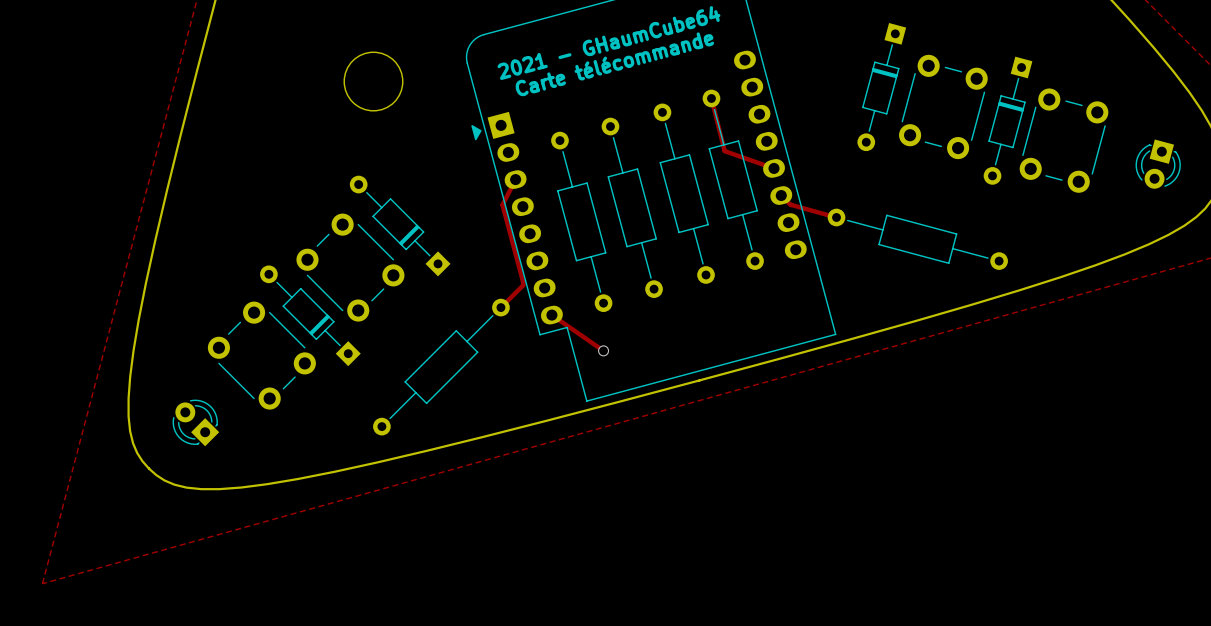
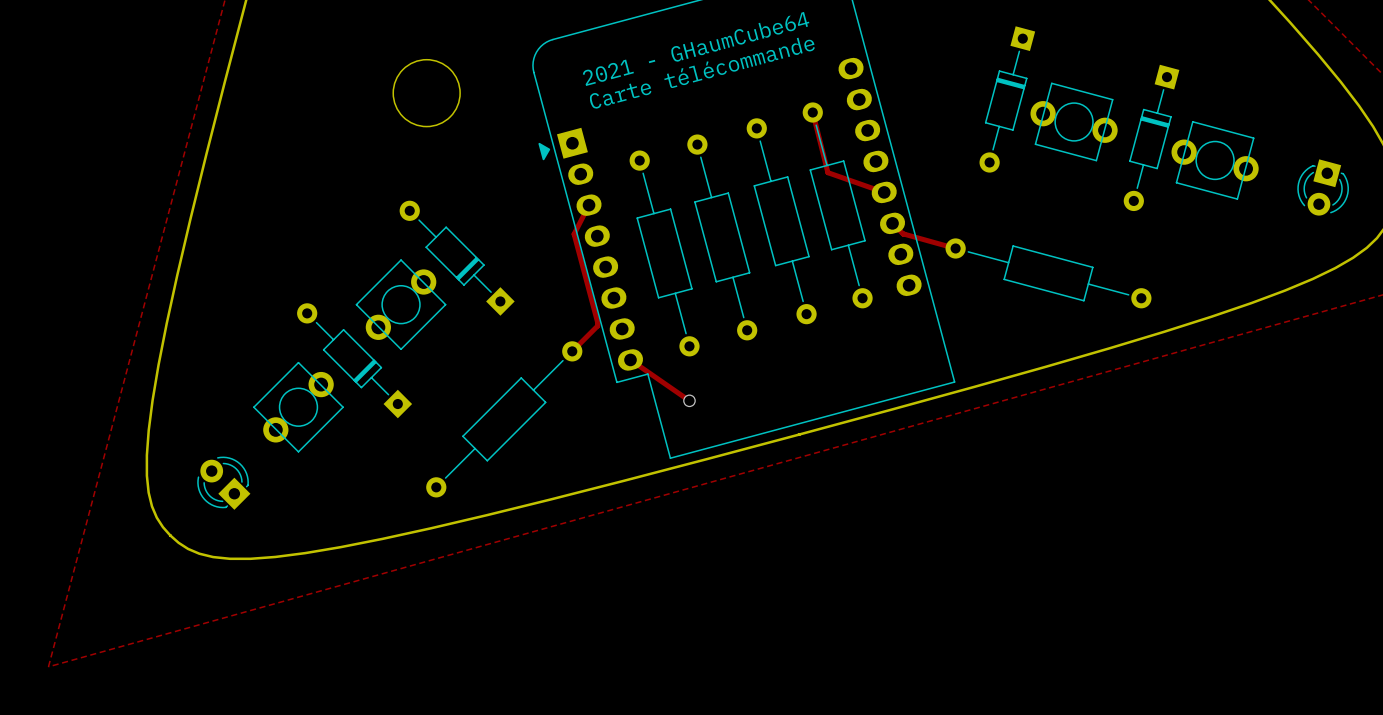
part footprint: [899, 54, 988, 160] -> [1030, 82, 1118, 162]
part footprint: [1019, 88, 1109, 193] -> [1171, 121, 1259, 200]
part footprint: [296, 213, 405, 322] -> [355, 259, 447, 351]
part footprint: [207, 301, 316, 410] -> [253, 361, 344, 453]

